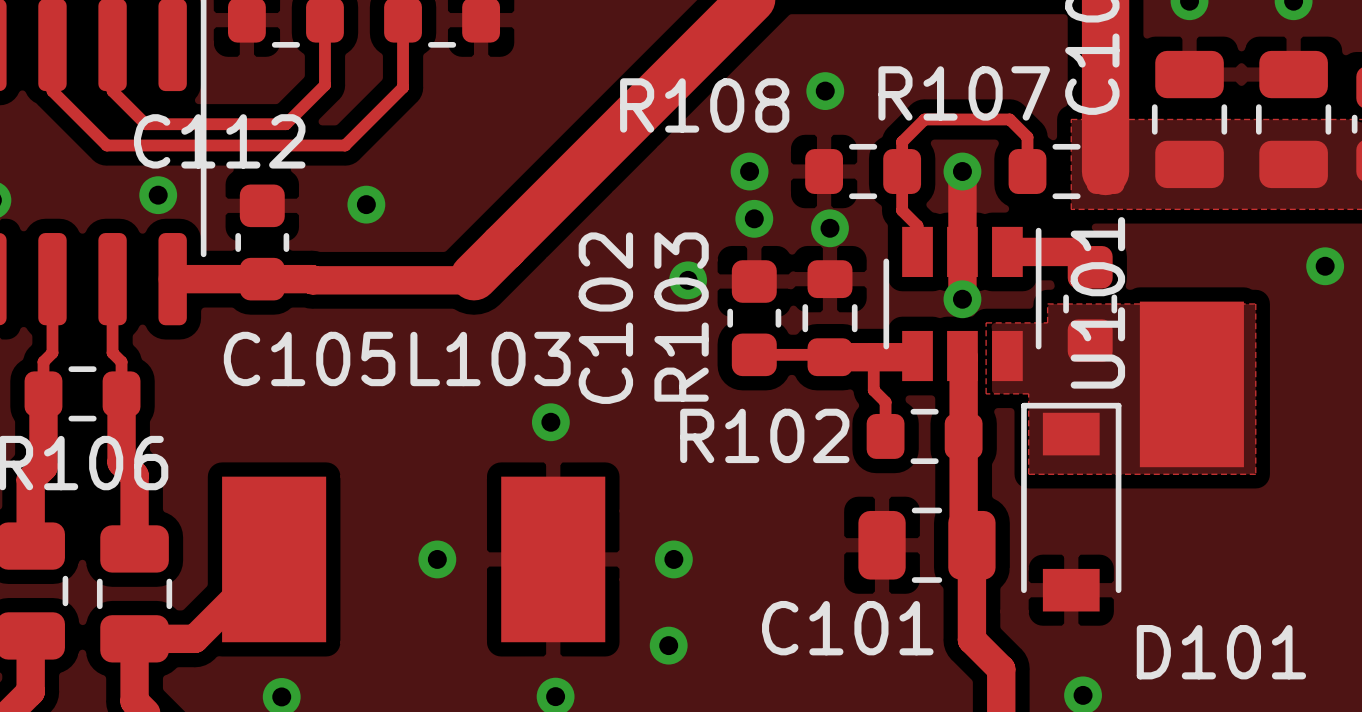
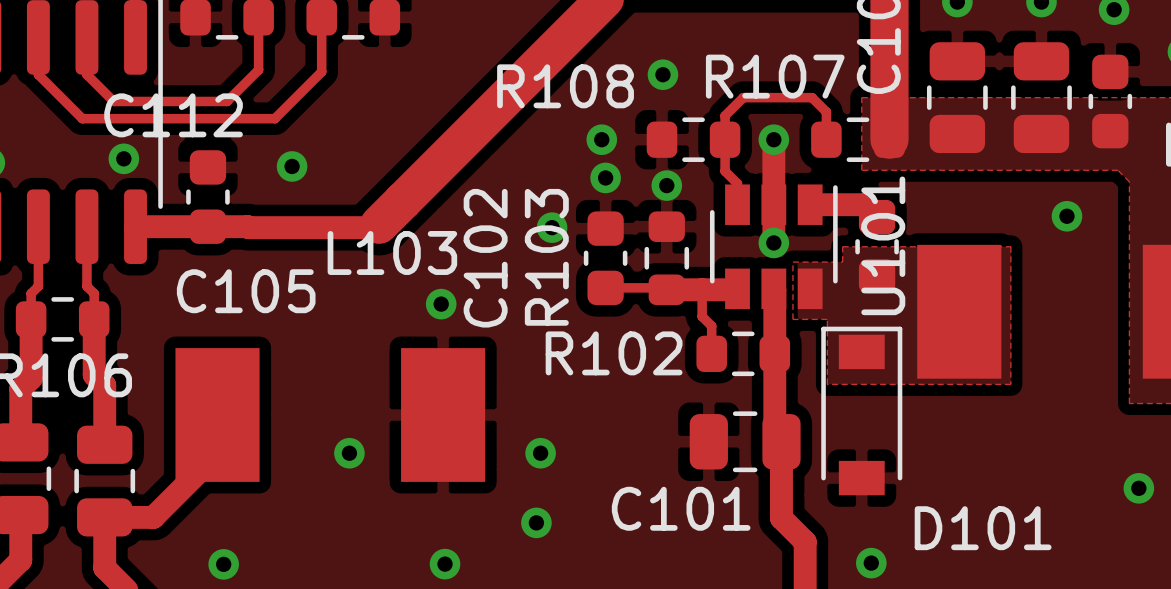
via position: (550, 422) -> (441, 304)
L103 position: (413, 559) -> (330, 415)

